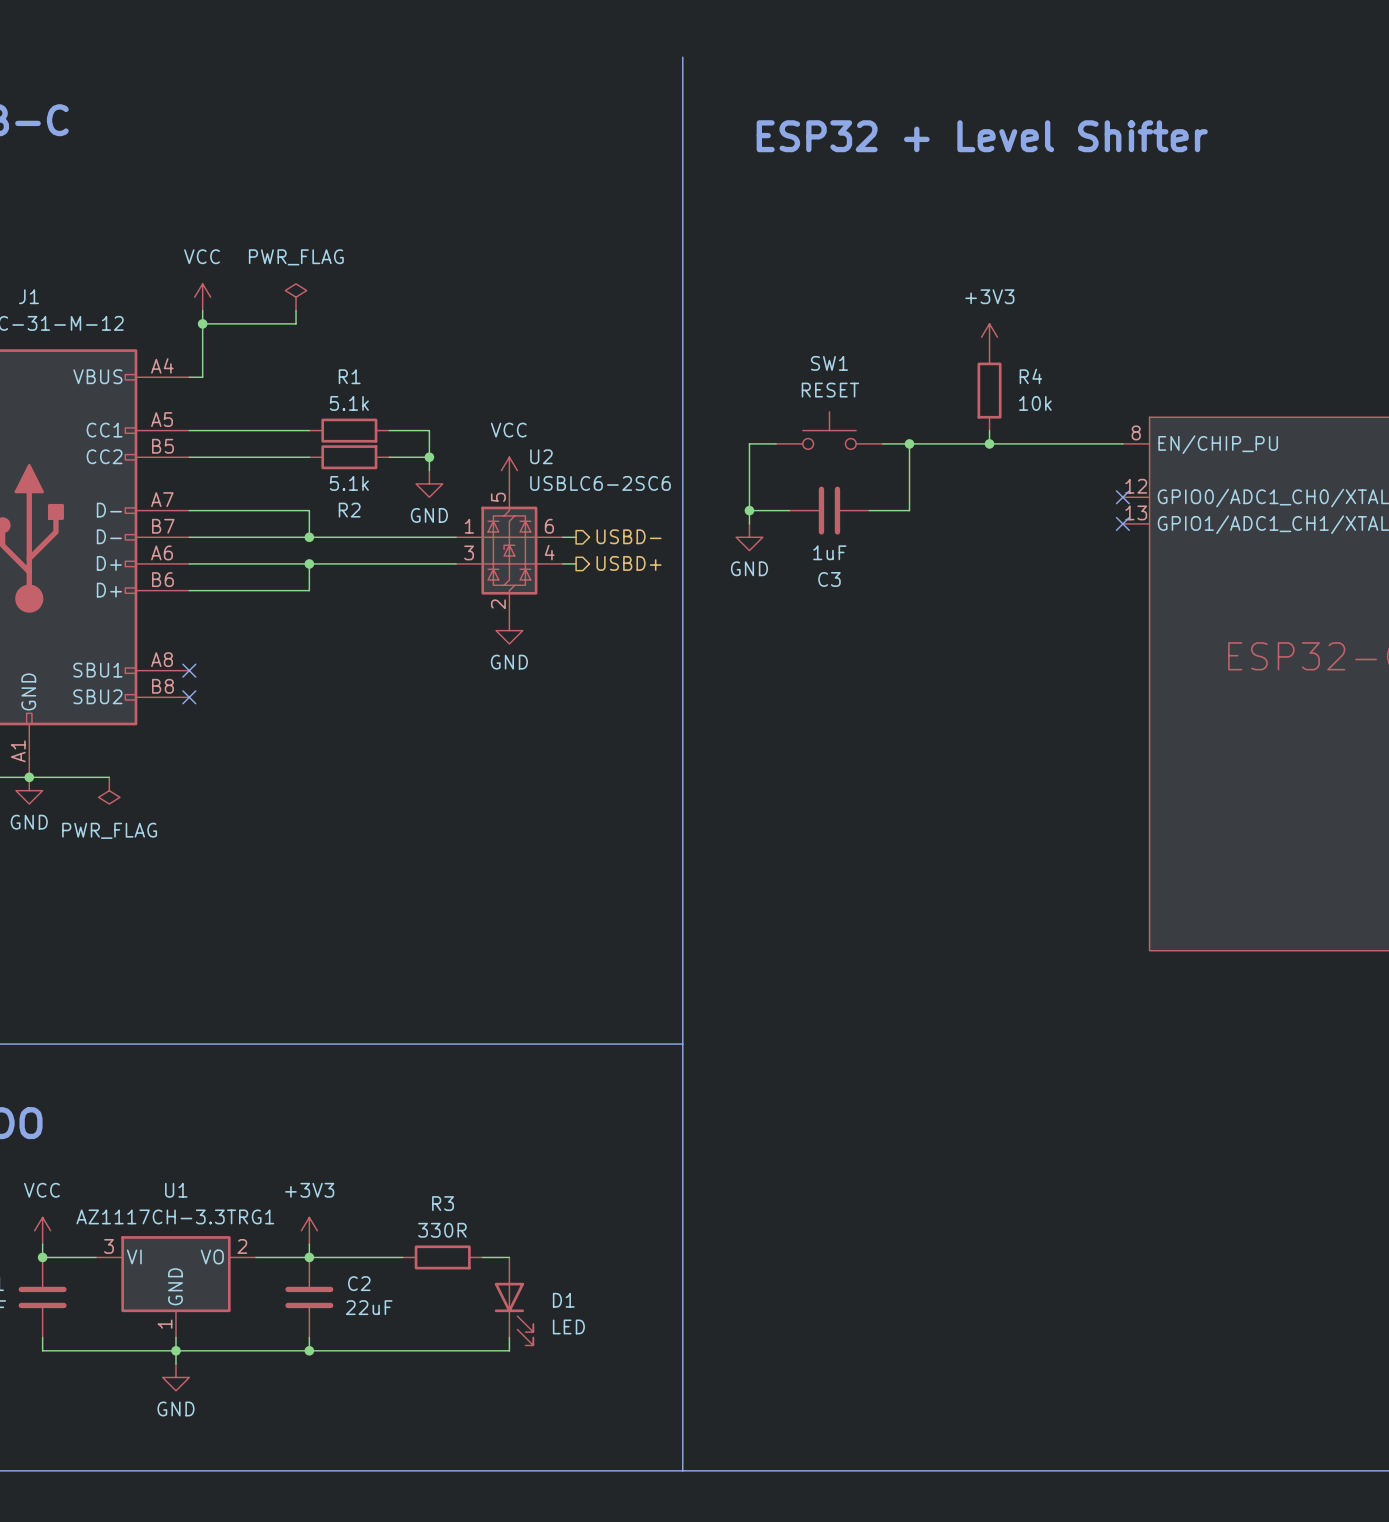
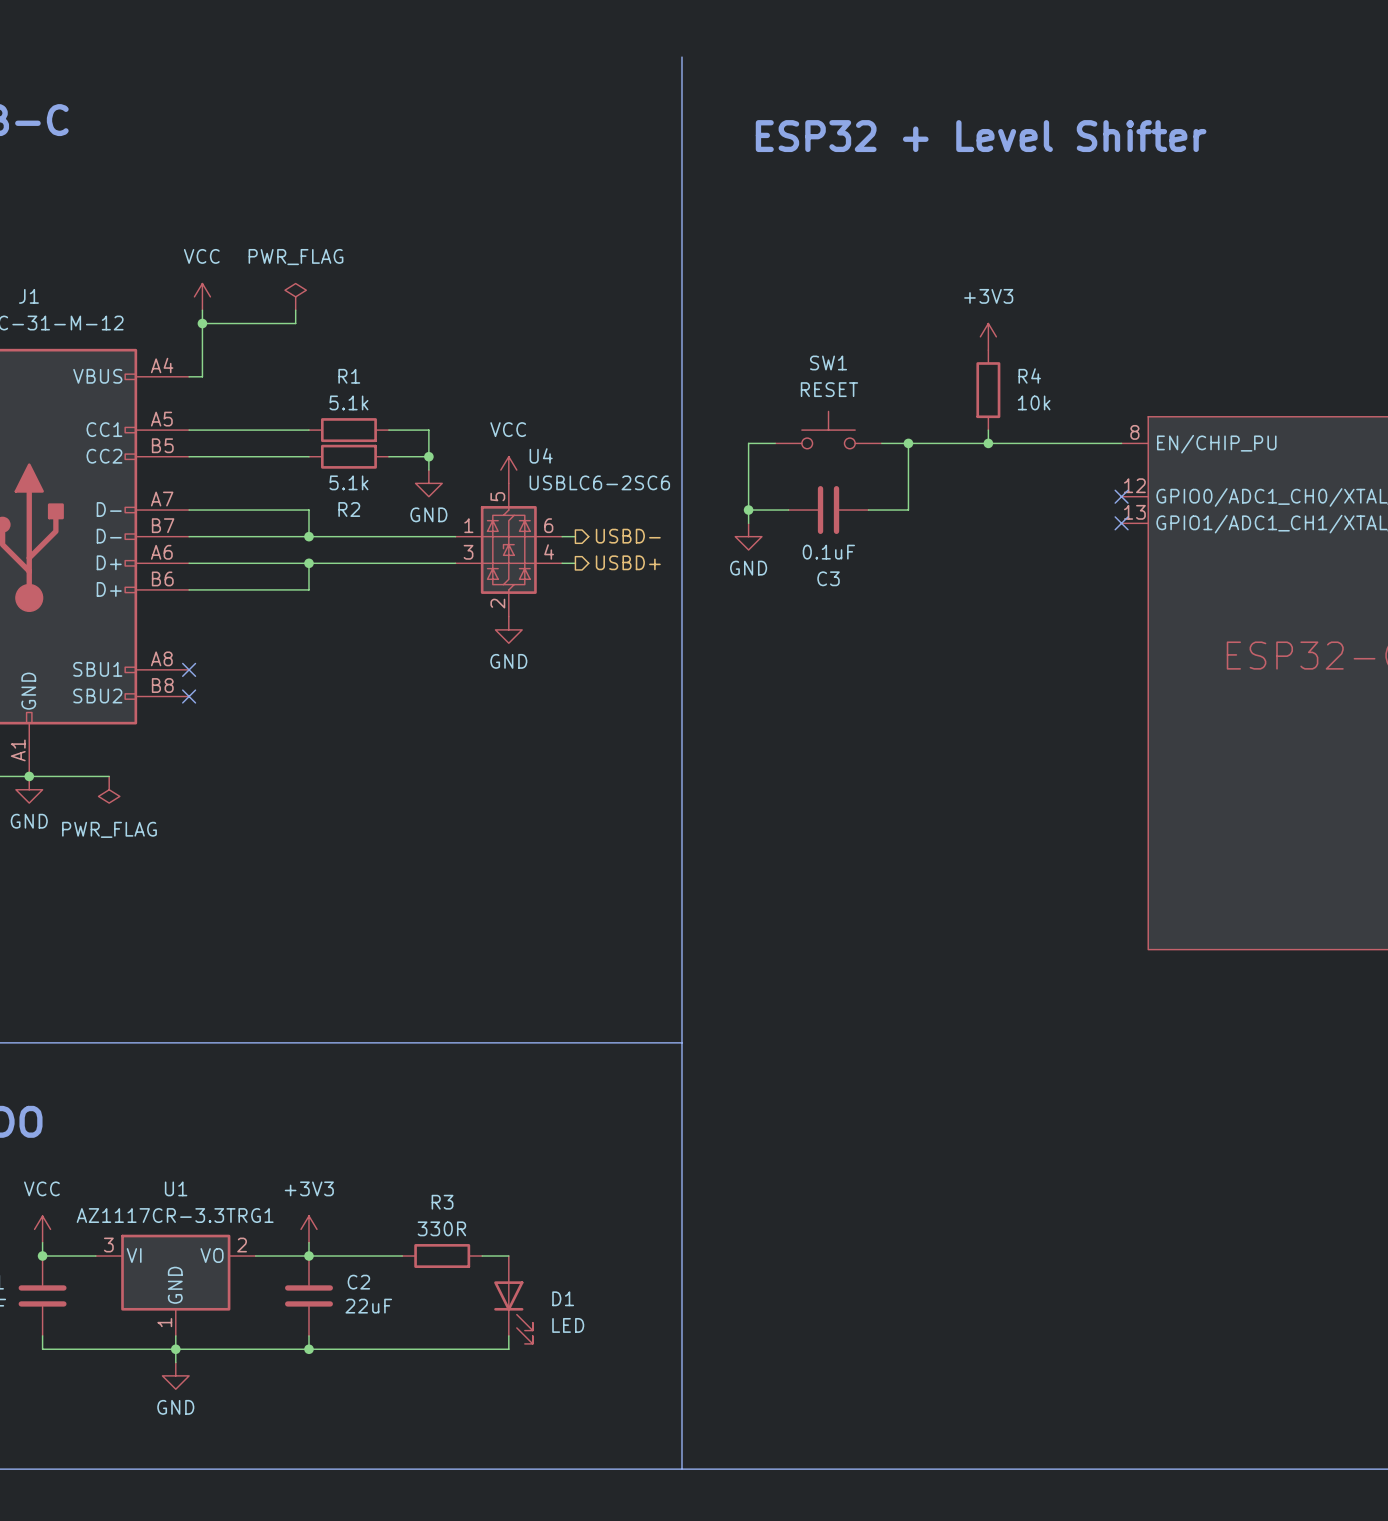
U2 name: U2 (541, 456) -> U4 (541, 455)
C3 value: 1uF (829, 552) -> 0.1uF (828, 552)
U1 value: AZ1117CH-3.3TRG1 (175, 1216) -> AZ1117CR-3.3TRG1 (175, 1215)

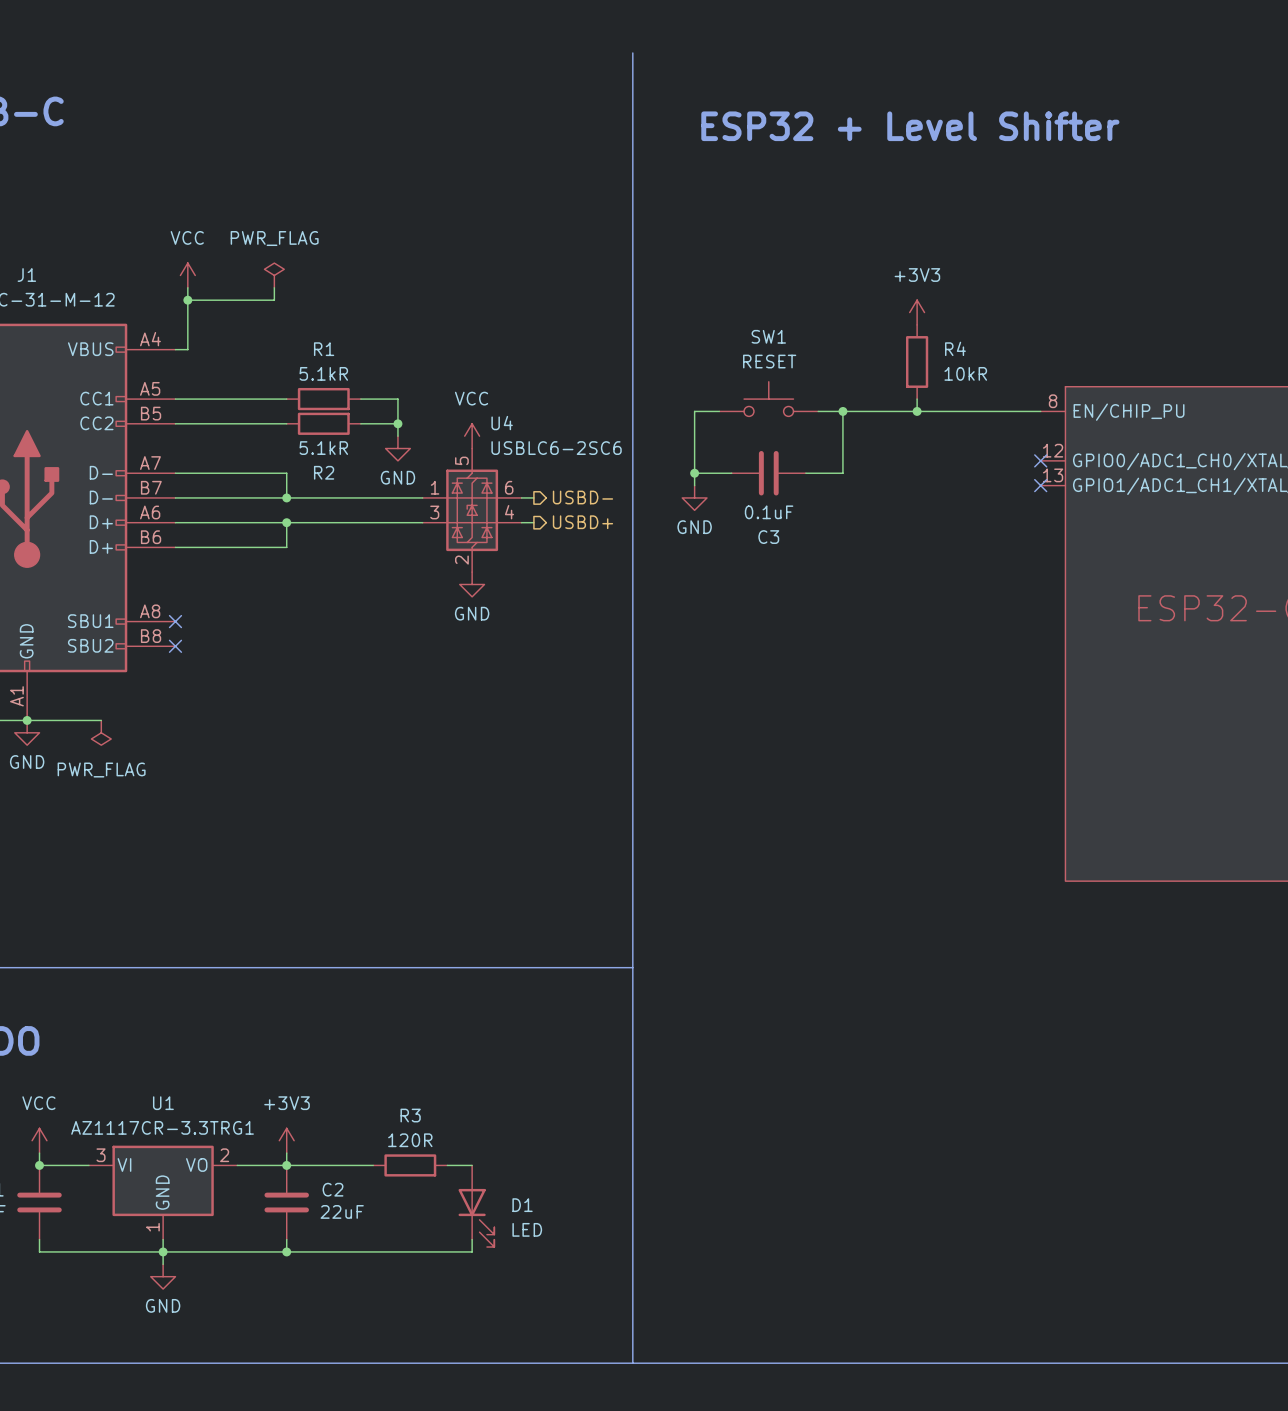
R1 value: 5.1k (348, 402) -> 5.1kR (323, 373)
R4 value: 10k (1034, 402) -> 10kR (965, 373)
R2 value: 5.1k (348, 482) -> 5.1kR (323, 448)
R3 value: 330R (441, 1228) -> 120R (410, 1140)

